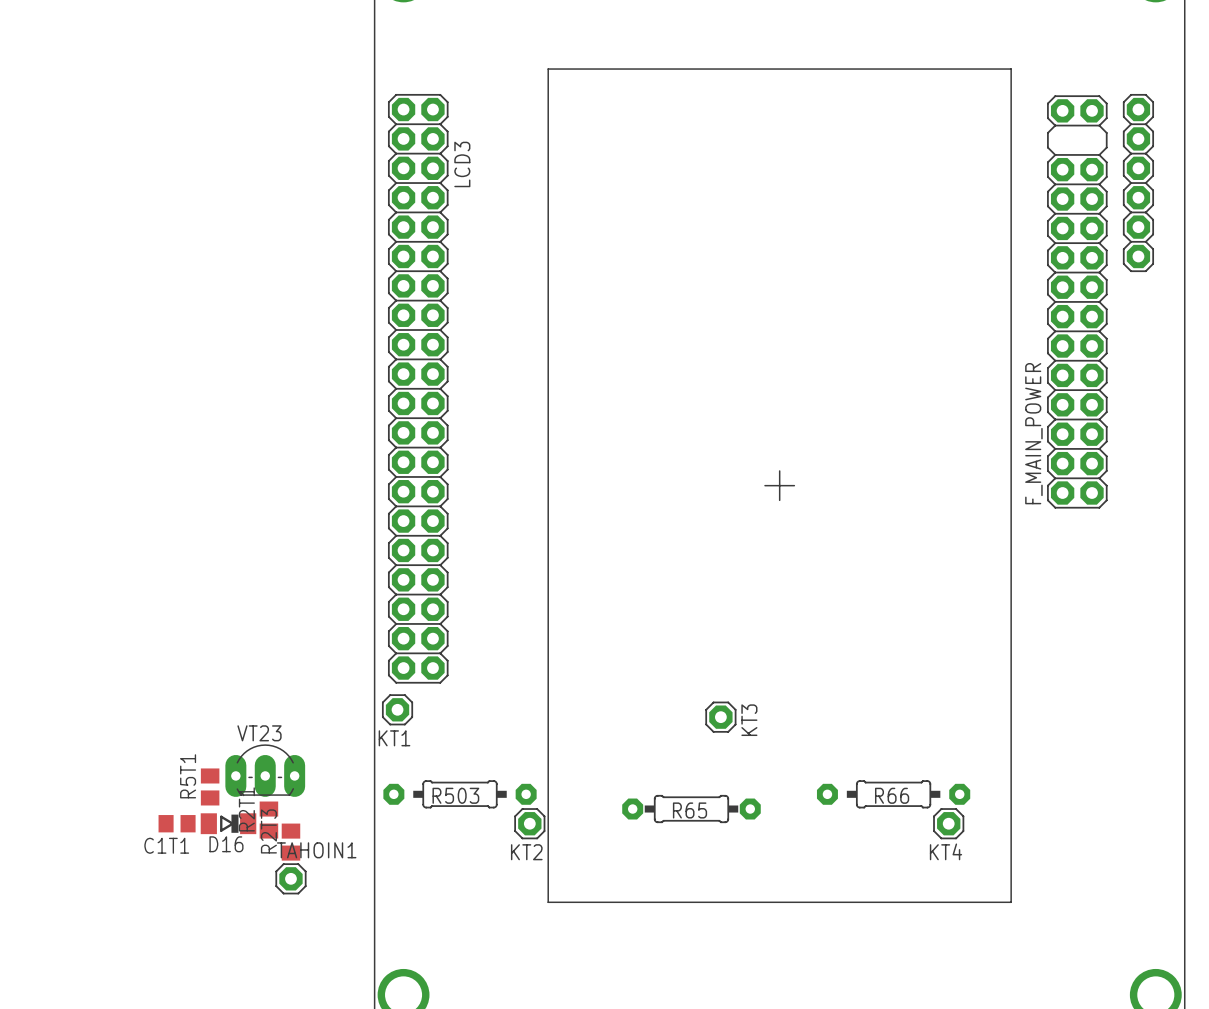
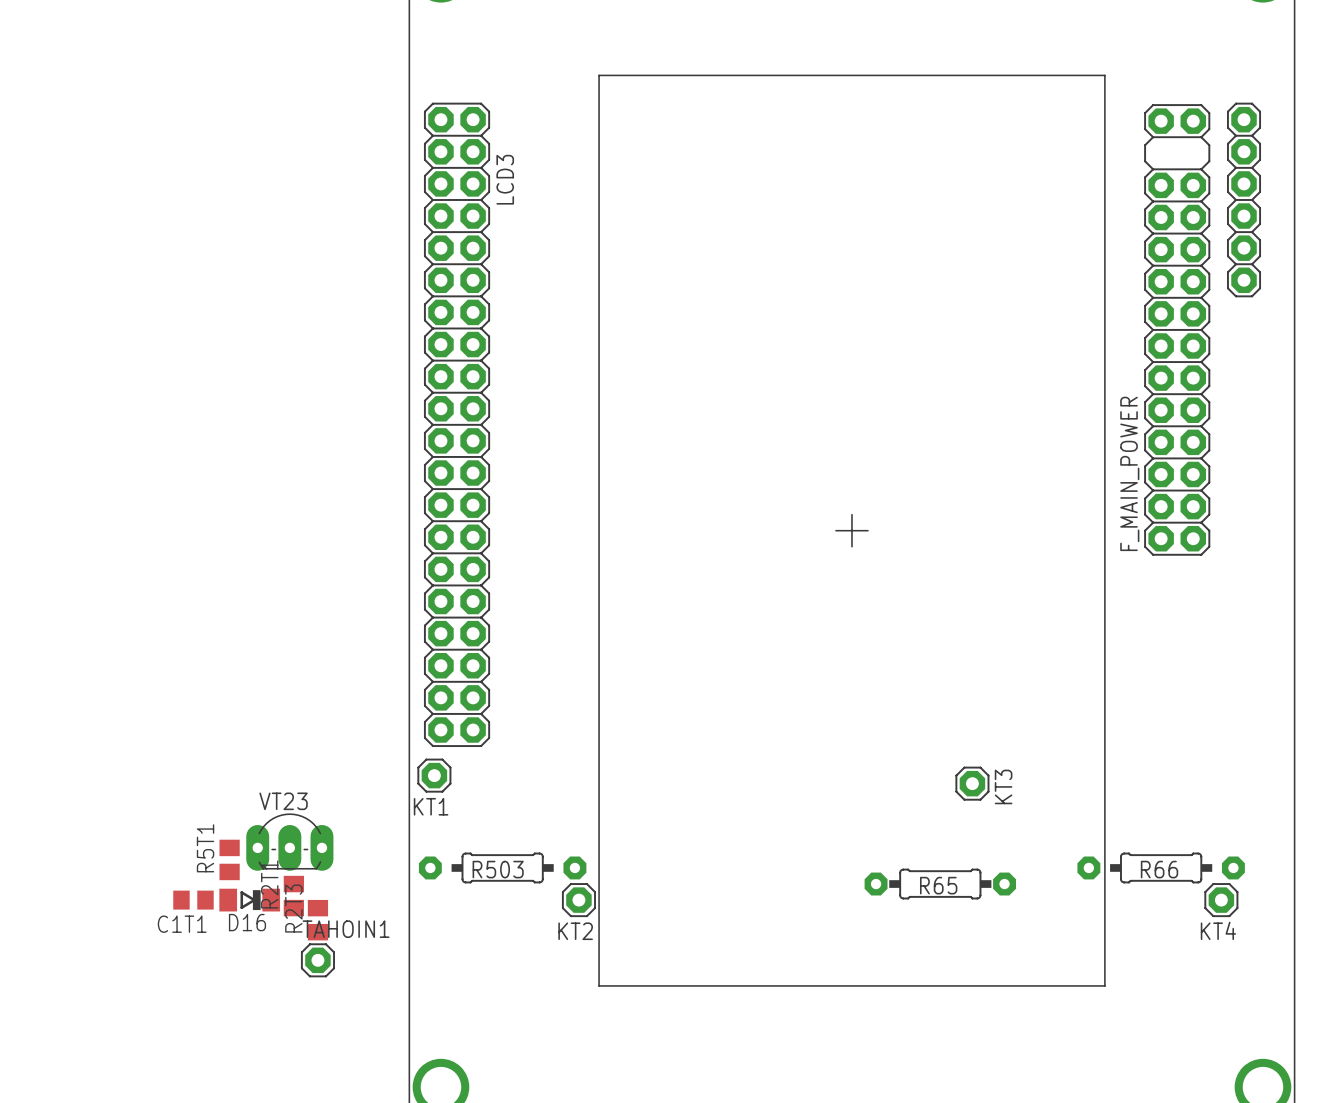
KT3 position: (720, 717) -> (972, 783)
R66 position: (893, 794) -> (1161, 867)
R65 position: (691, 809) -> (940, 884)
KT4 position: (948, 823) -> (1221, 900)

